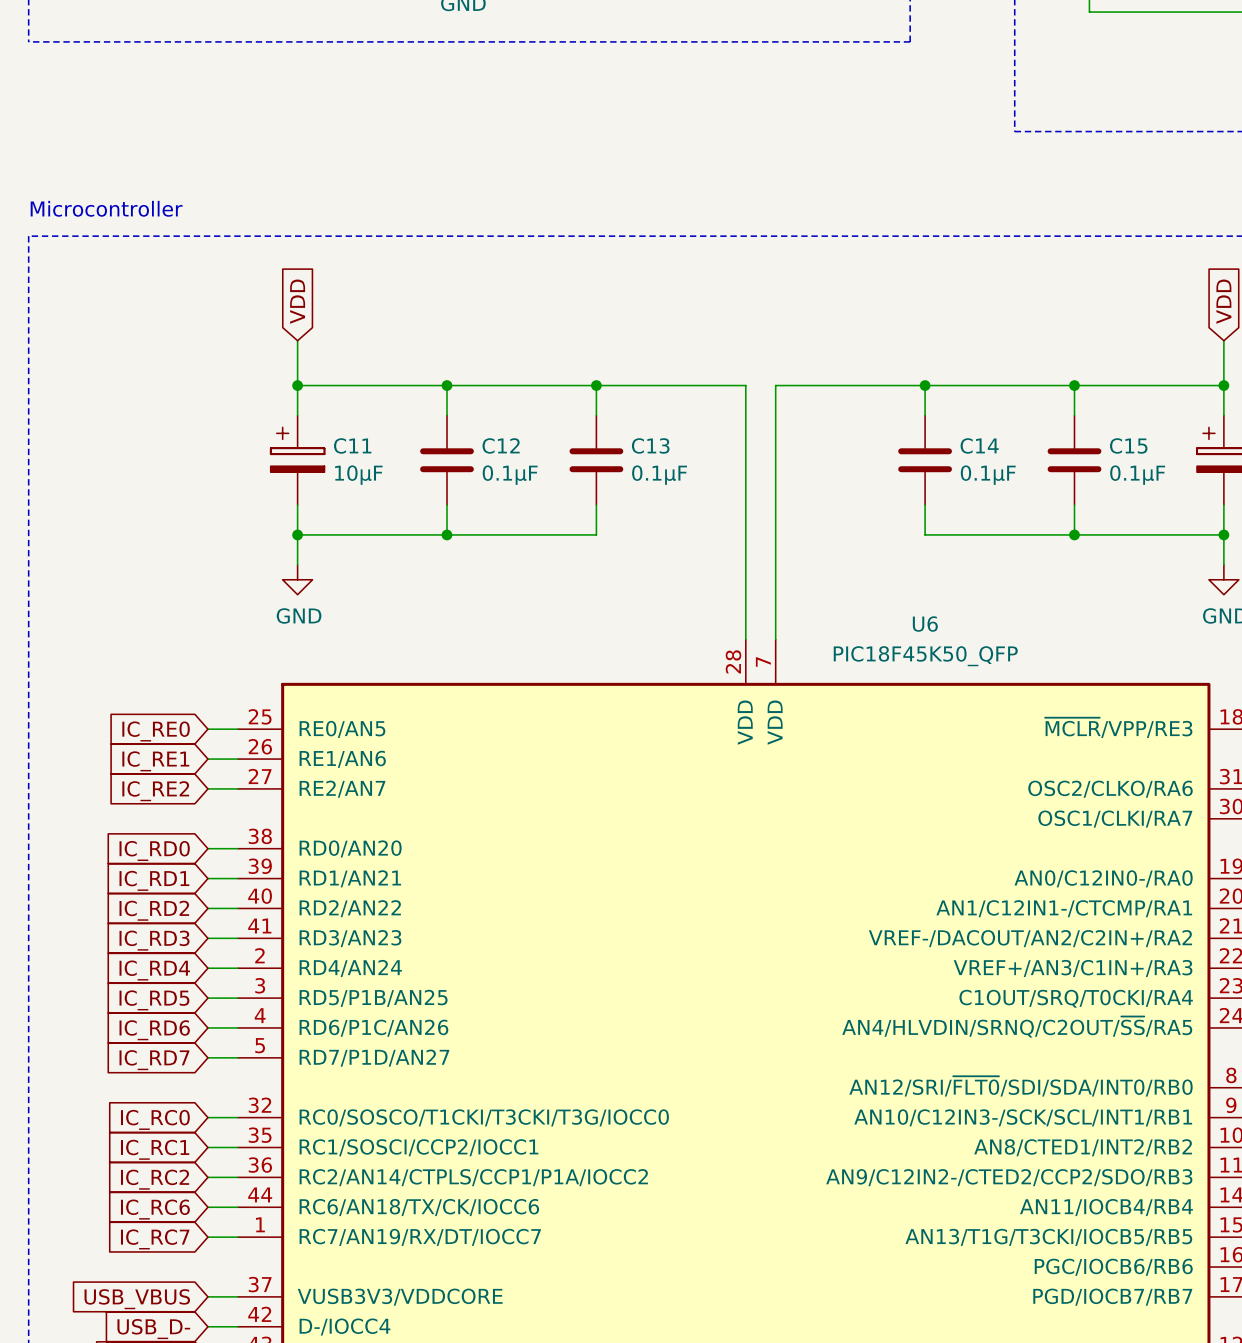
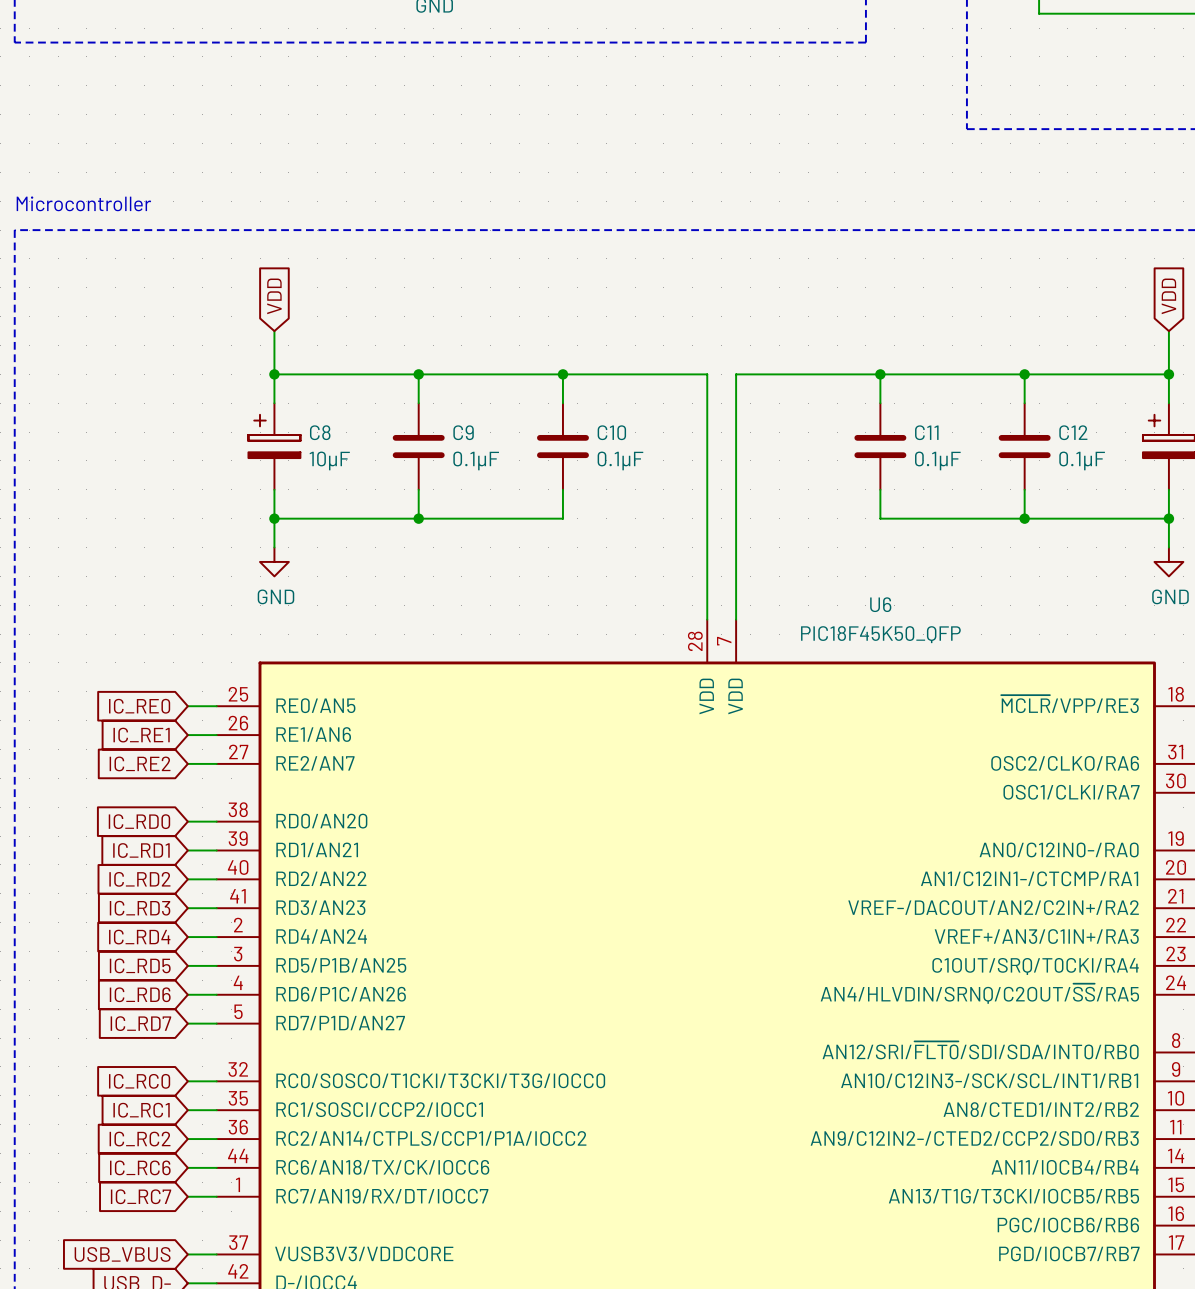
C11 name: C11 (352, 445) -> C8 (320, 432)
C12 name: C12 (501, 445) -> C9 (463, 432)
C13 name: C13 (650, 445) -> C10 (611, 432)
C14 name: C14 (979, 445) -> C11 (926, 432)
C15 name: C15 (1128, 445) -> C12 (1073, 432)

